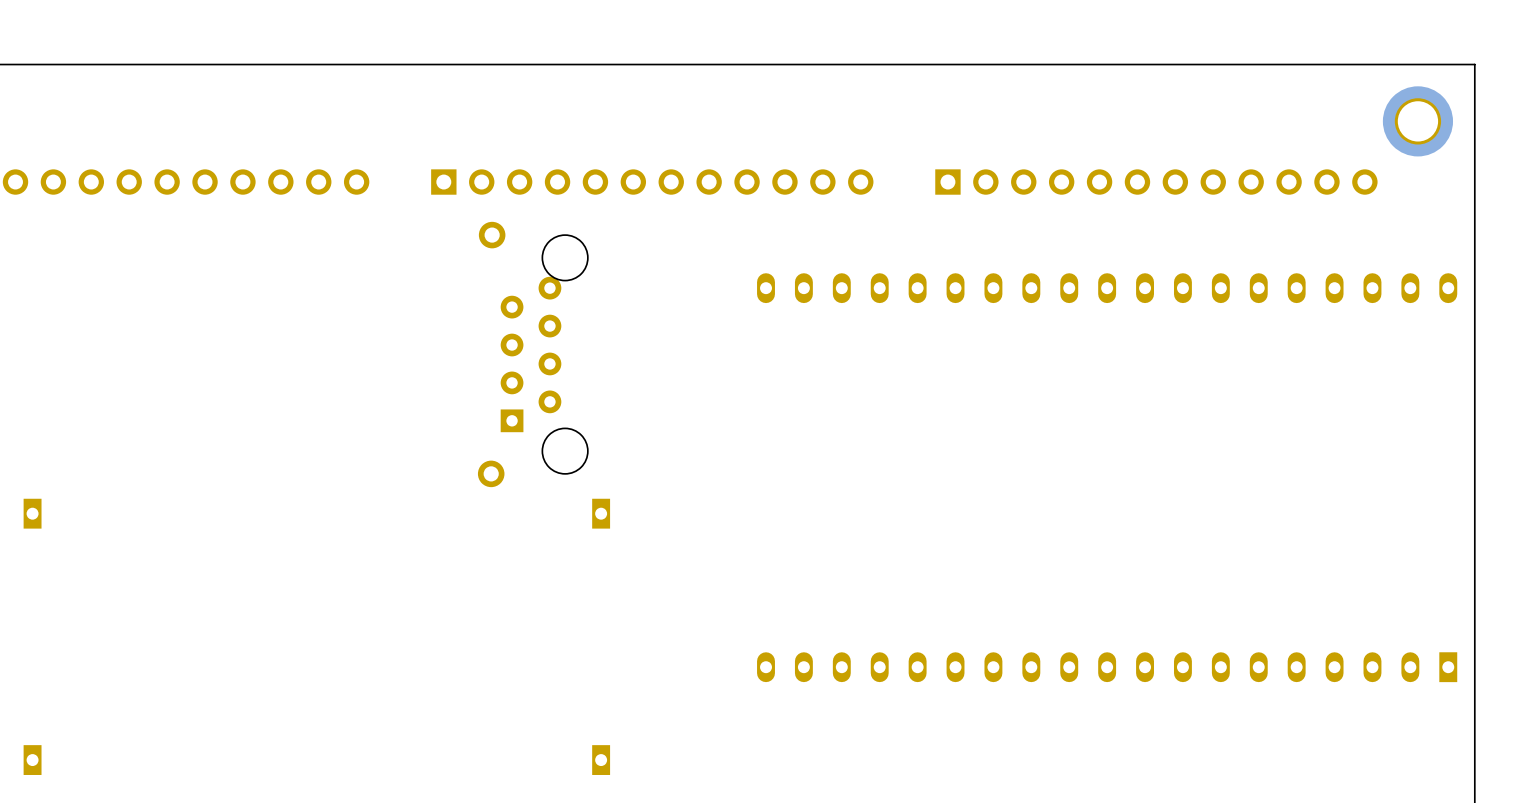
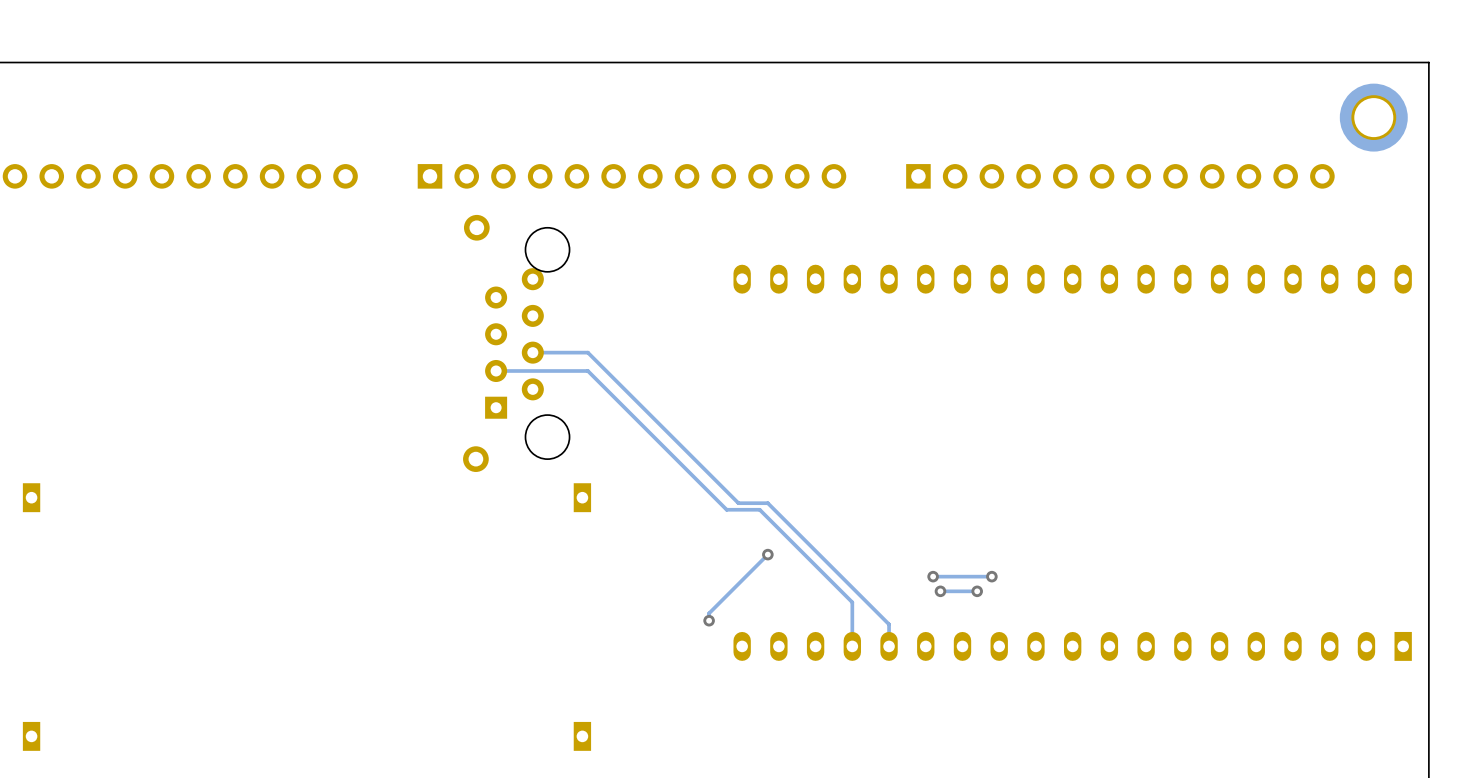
track: none -> (532, 352) (587, 352) (738, 503) (767, 503) (889, 624) (889, 646)
track: none -> (496, 370) (587, 370) (726, 509) (759, 509) (852, 602) (852, 646)
track: none -> (767, 554) (709, 613) (709, 620)
via: none -> (767, 554)
via: none -> (933, 576)
track: none -> (991, 576) (933, 576)
via: none -> (991, 576)
via: none -> (940, 591)
track: none -> (977, 591) (940, 591)
via: none -> (977, 591)
via: none -> (709, 620)

